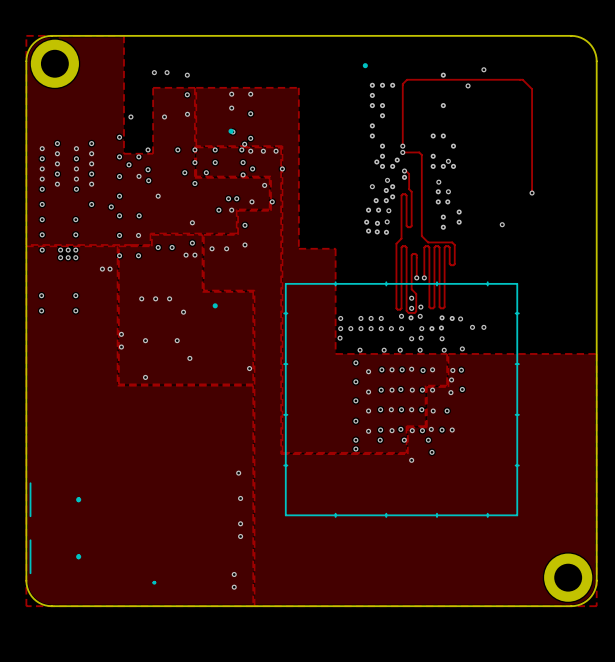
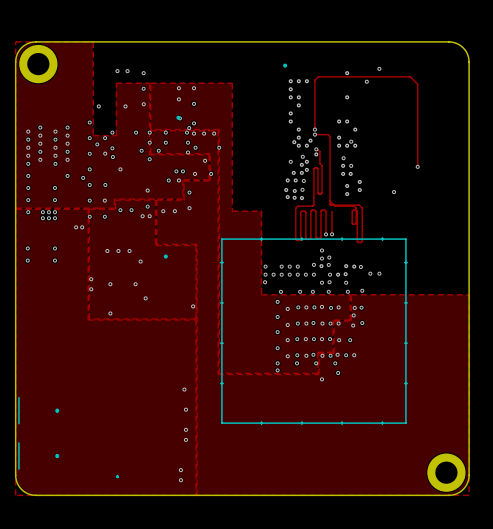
track: (401, 238) (396, 243) (396, 308) (401, 308) (401, 247) (405, 246) (406, 310) (408, 312) (416, 311) (416, 293) (411, 289) (411, 255) (416, 255) -> (313, 203) (312, 206) (297, 206) (295, 208) (295, 239) (300, 239) (301, 211) (305, 212) (306, 239) (310, 238) (310, 211) (315, 211) (316, 238) (320, 237) (321, 210) (326, 211) (326, 216)
track: (424, 248) (425, 246) (429, 247) (430, 308) (434, 307) (434, 247) (439, 247) (440, 308) (444, 307) (444, 247) (448, 246) (449, 248) -> (330, 201) (331, 205) (359, 205) (362, 208) (361, 242) (357, 241) (357, 211) (352, 211)

